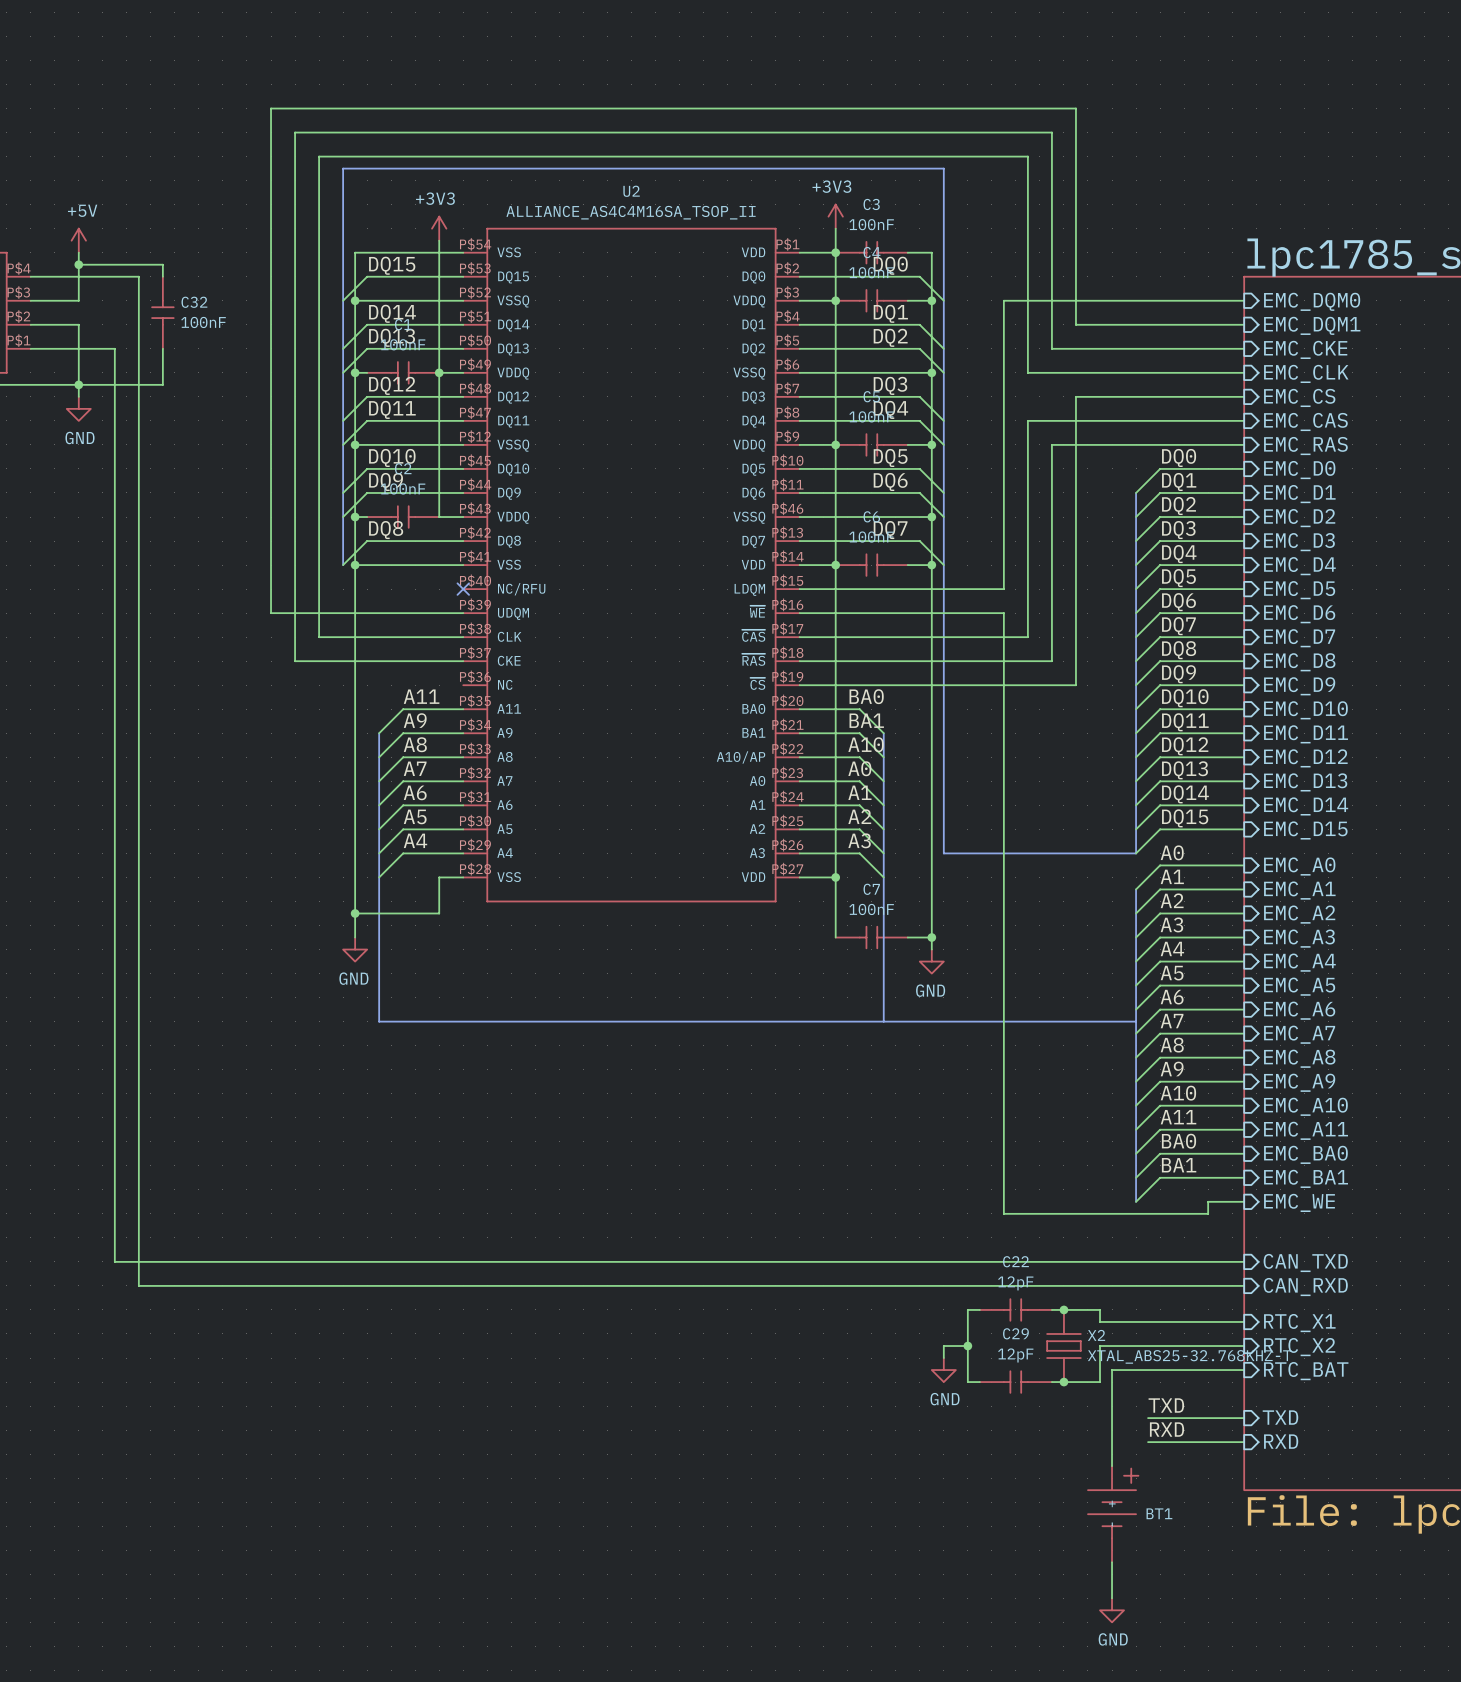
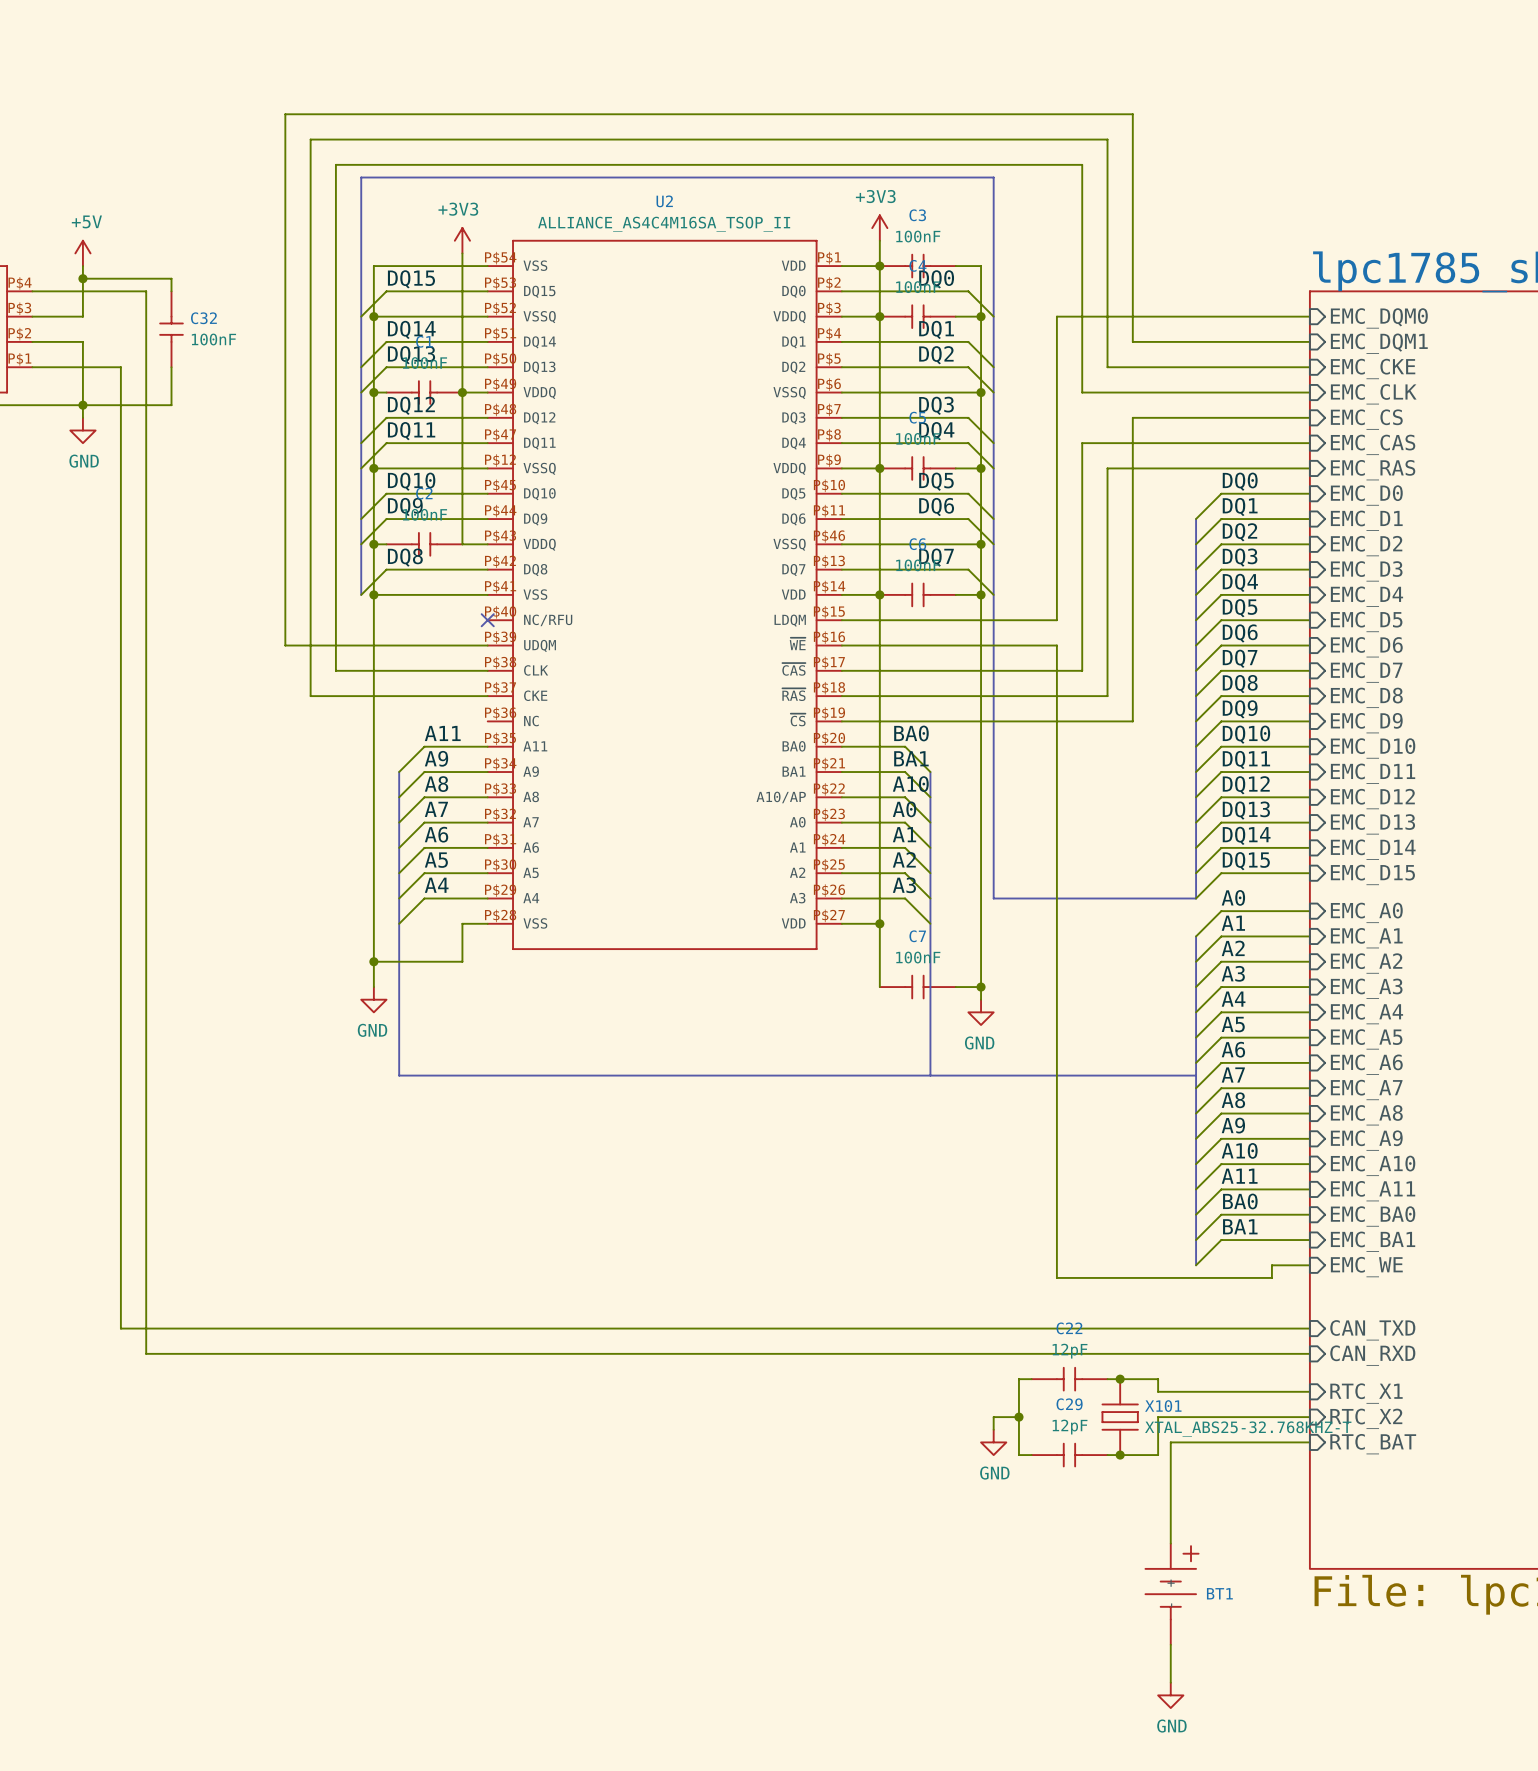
X2 name: X2 (1096, 1335) -> X101 (1163, 1406)
label: TXD (1166, 1405) -> none
sheet pin: TXD (1280, 1417) -> none
wire: (1148, 1418) (1244, 1418) -> none
label: RXD (1167, 1429) -> none
sheet pin: RXD (1281, 1441) -> none
wire: (1148, 1442) (1244, 1442) -> none

